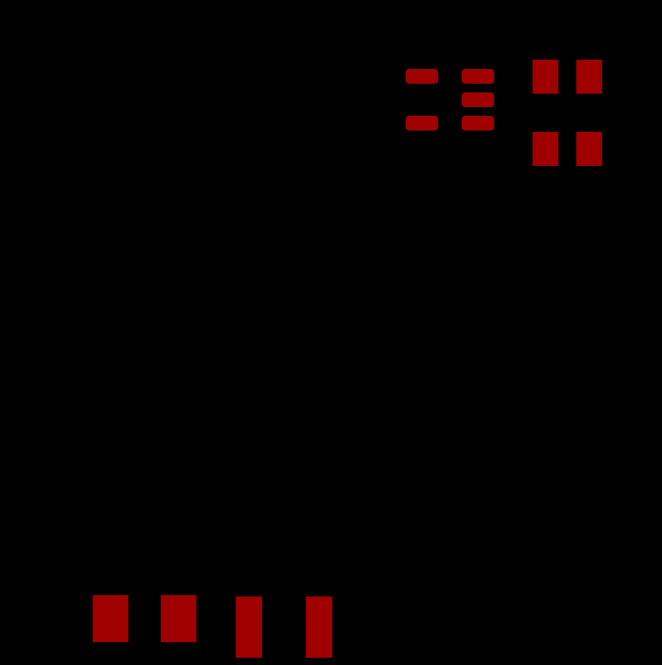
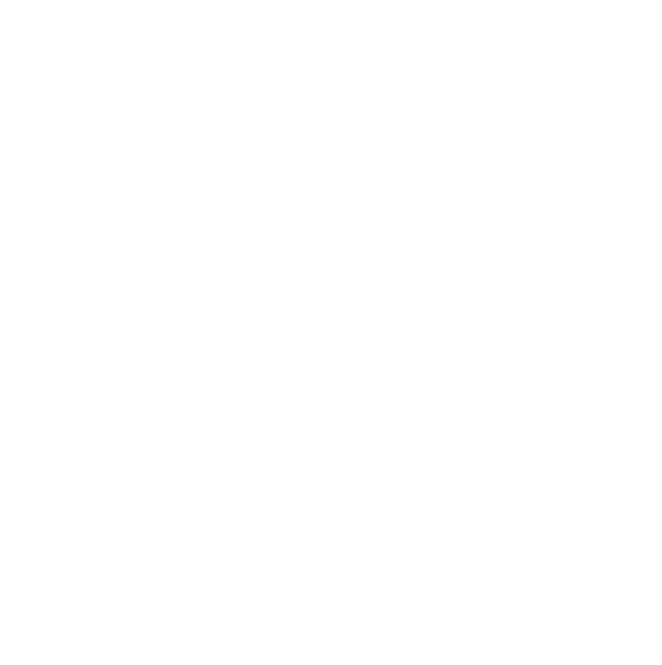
part: (567, 76) -> none
part: (449, 99) -> none
part: (567, 148) -> none
part: (144, 618) -> none
part: (284, 627) -> none

